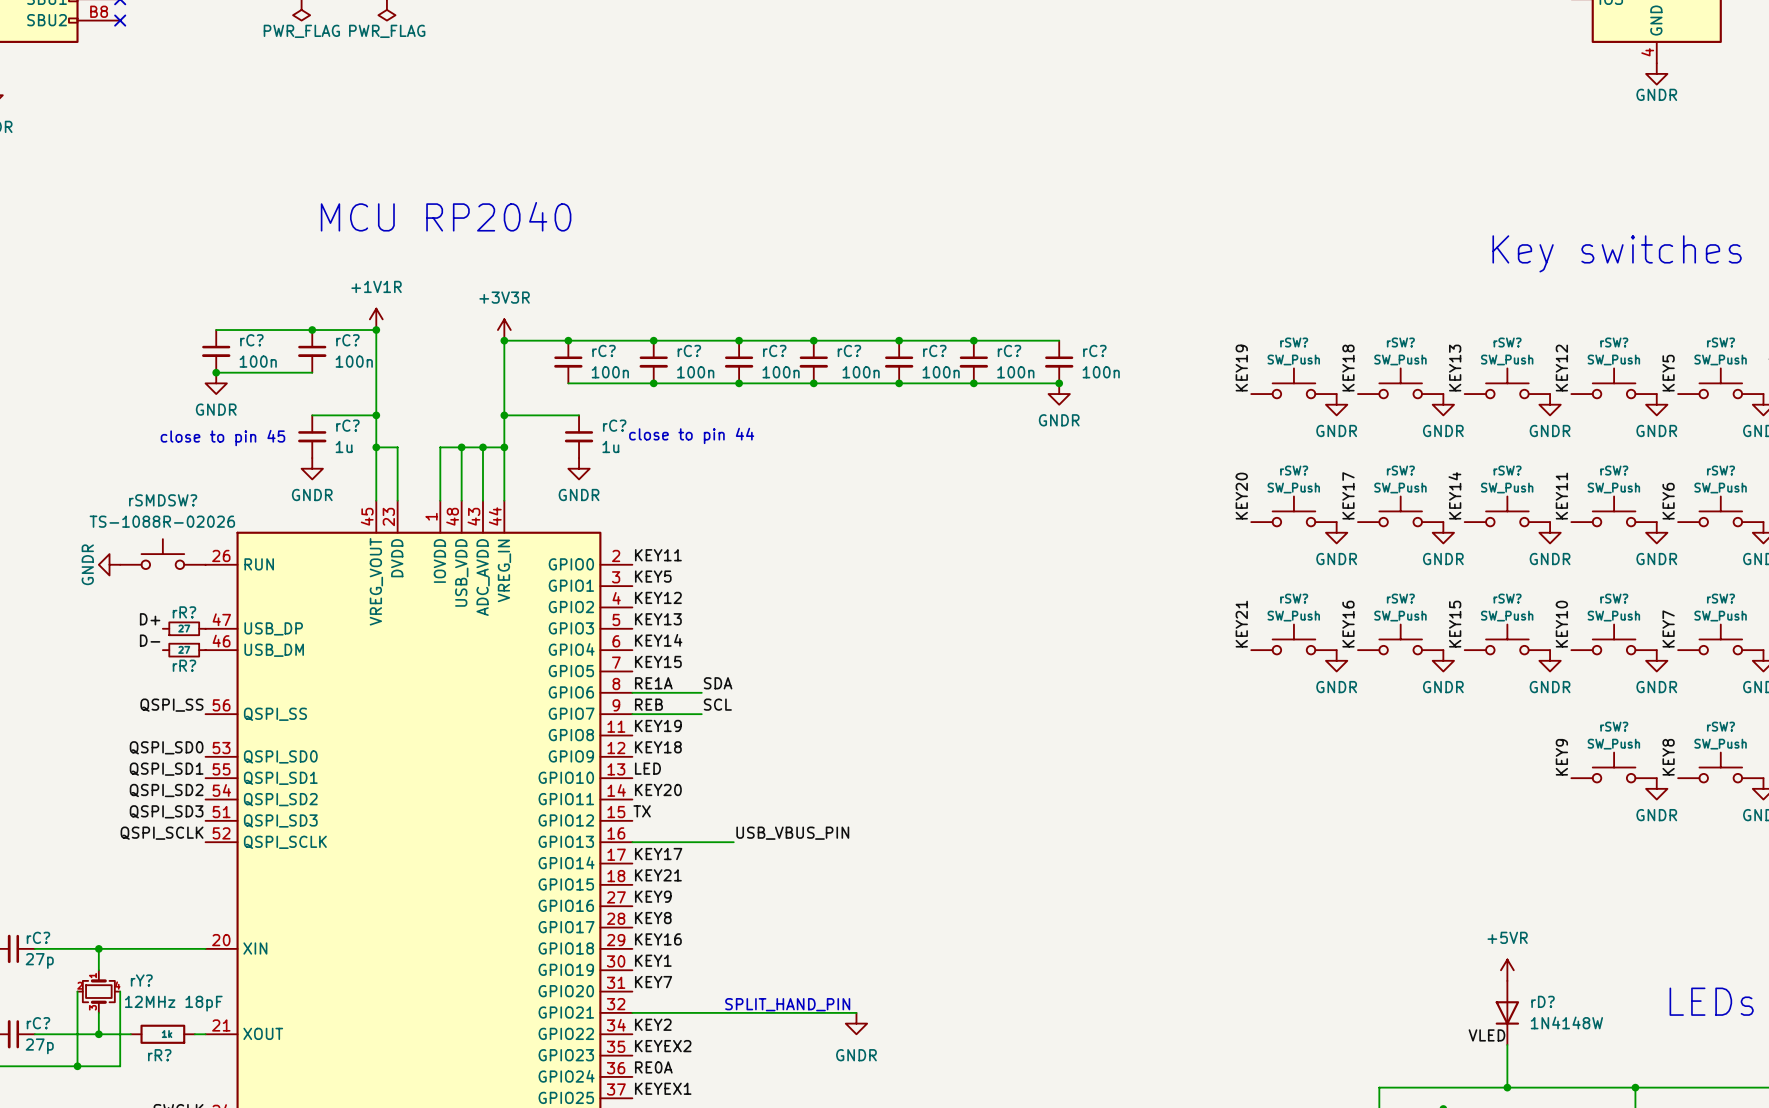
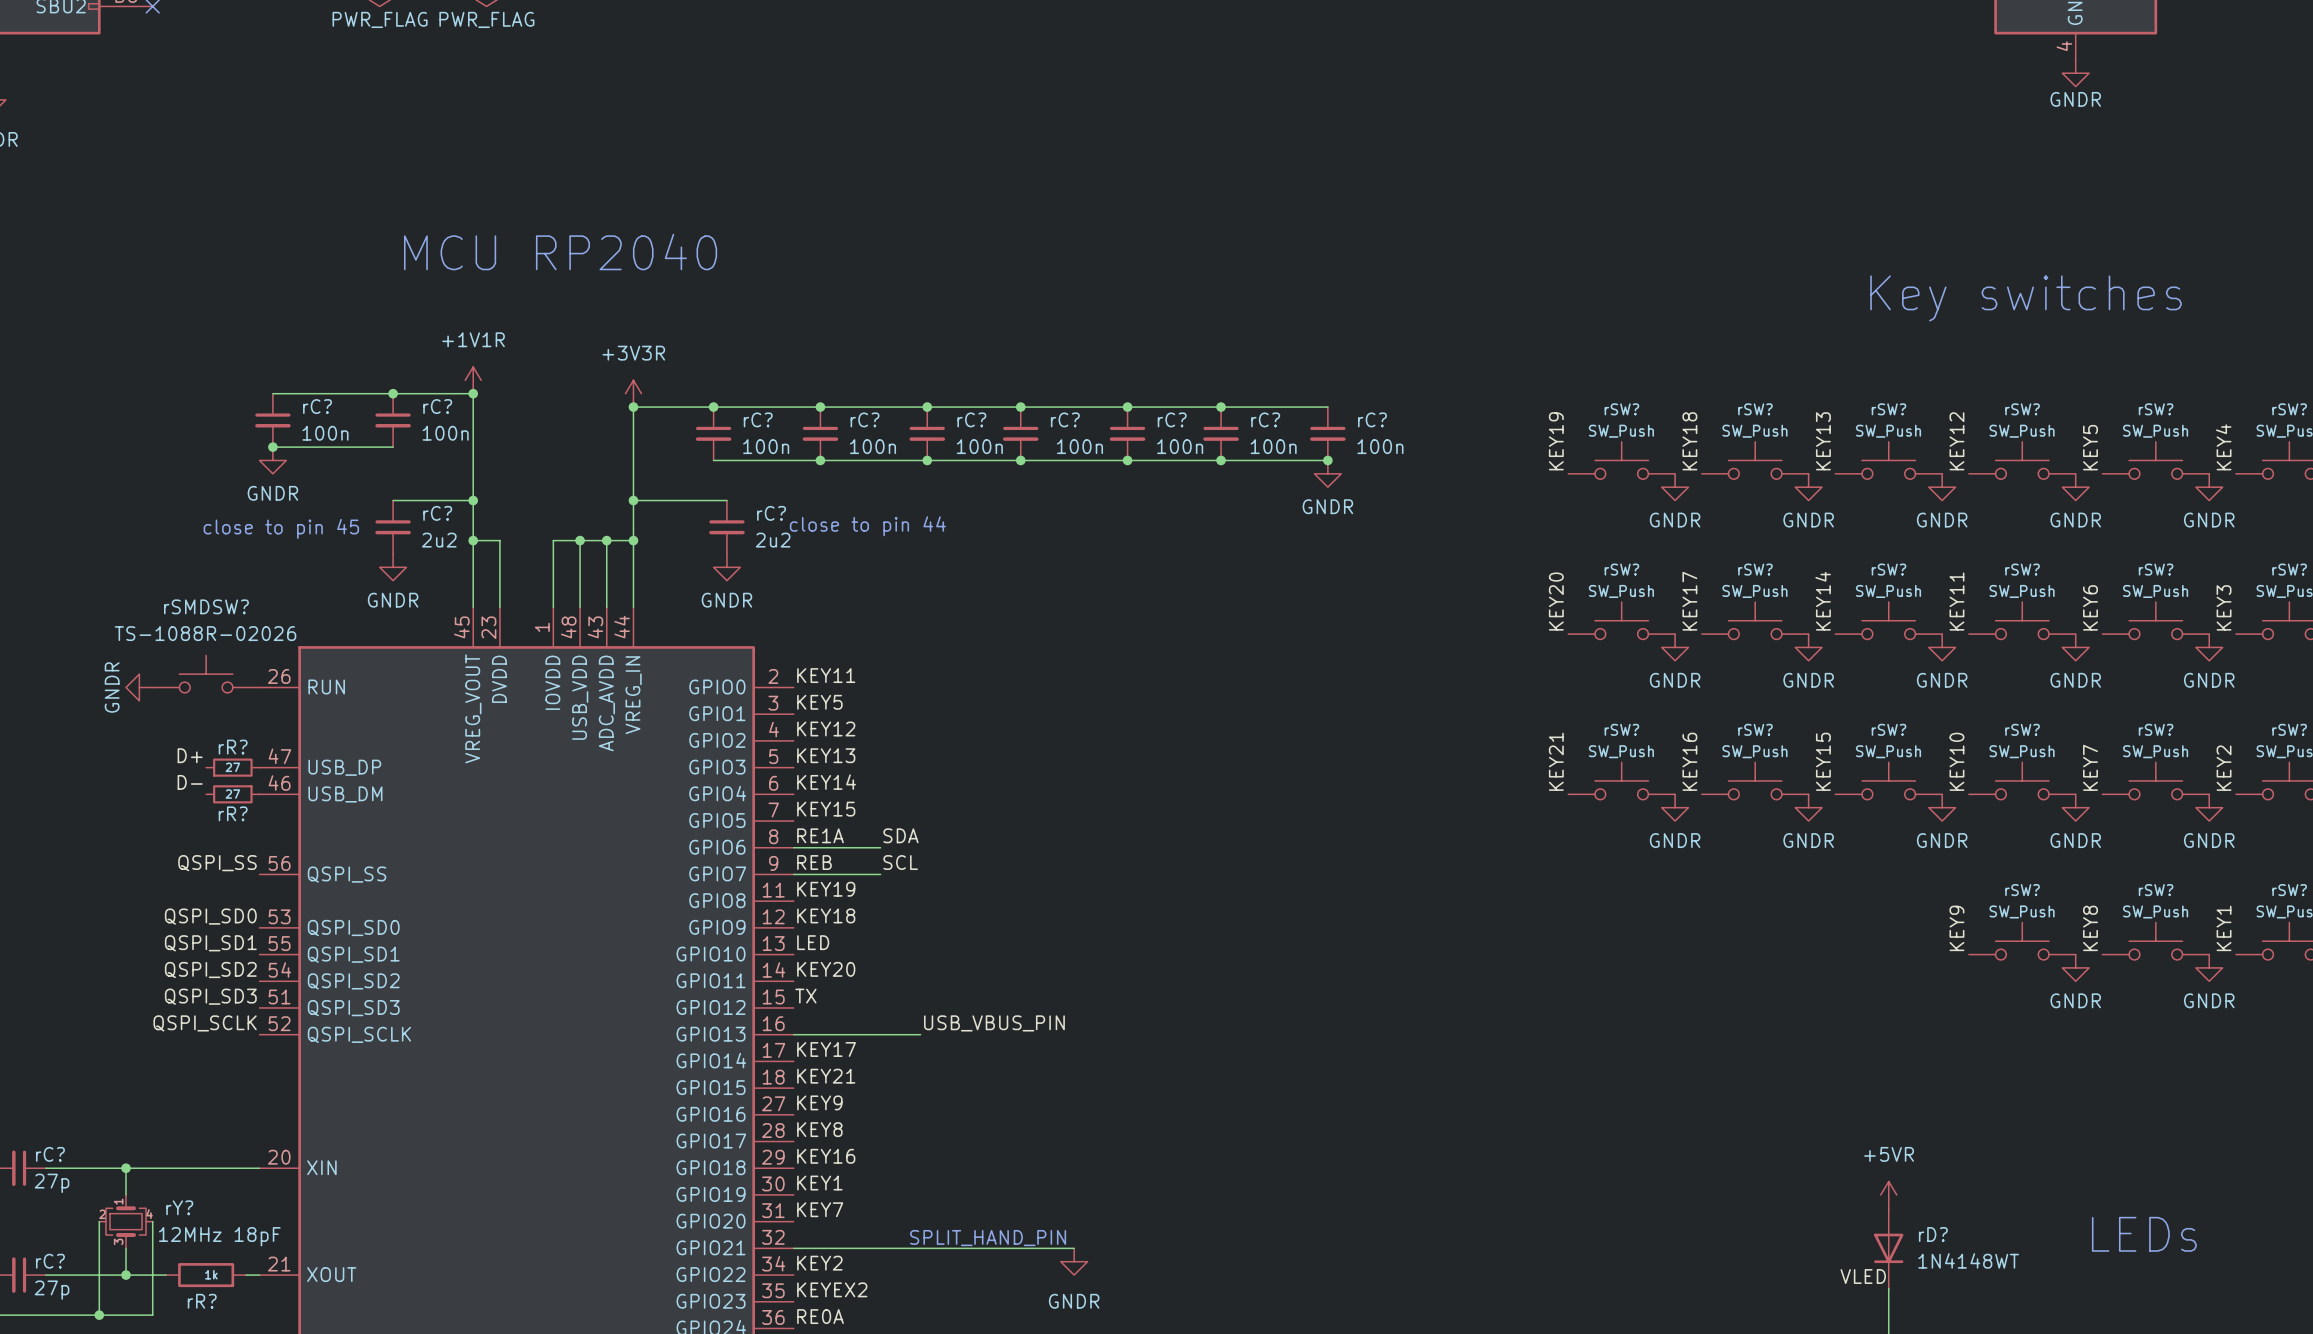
rC? value: 1u (344, 446) -> 2u2 (439, 540)
rC? value: 1u (610, 446) -> 2u2 (773, 540)
rD? value: 1N4148W (1566, 1022) -> 1N4148WT (1968, 1260)

